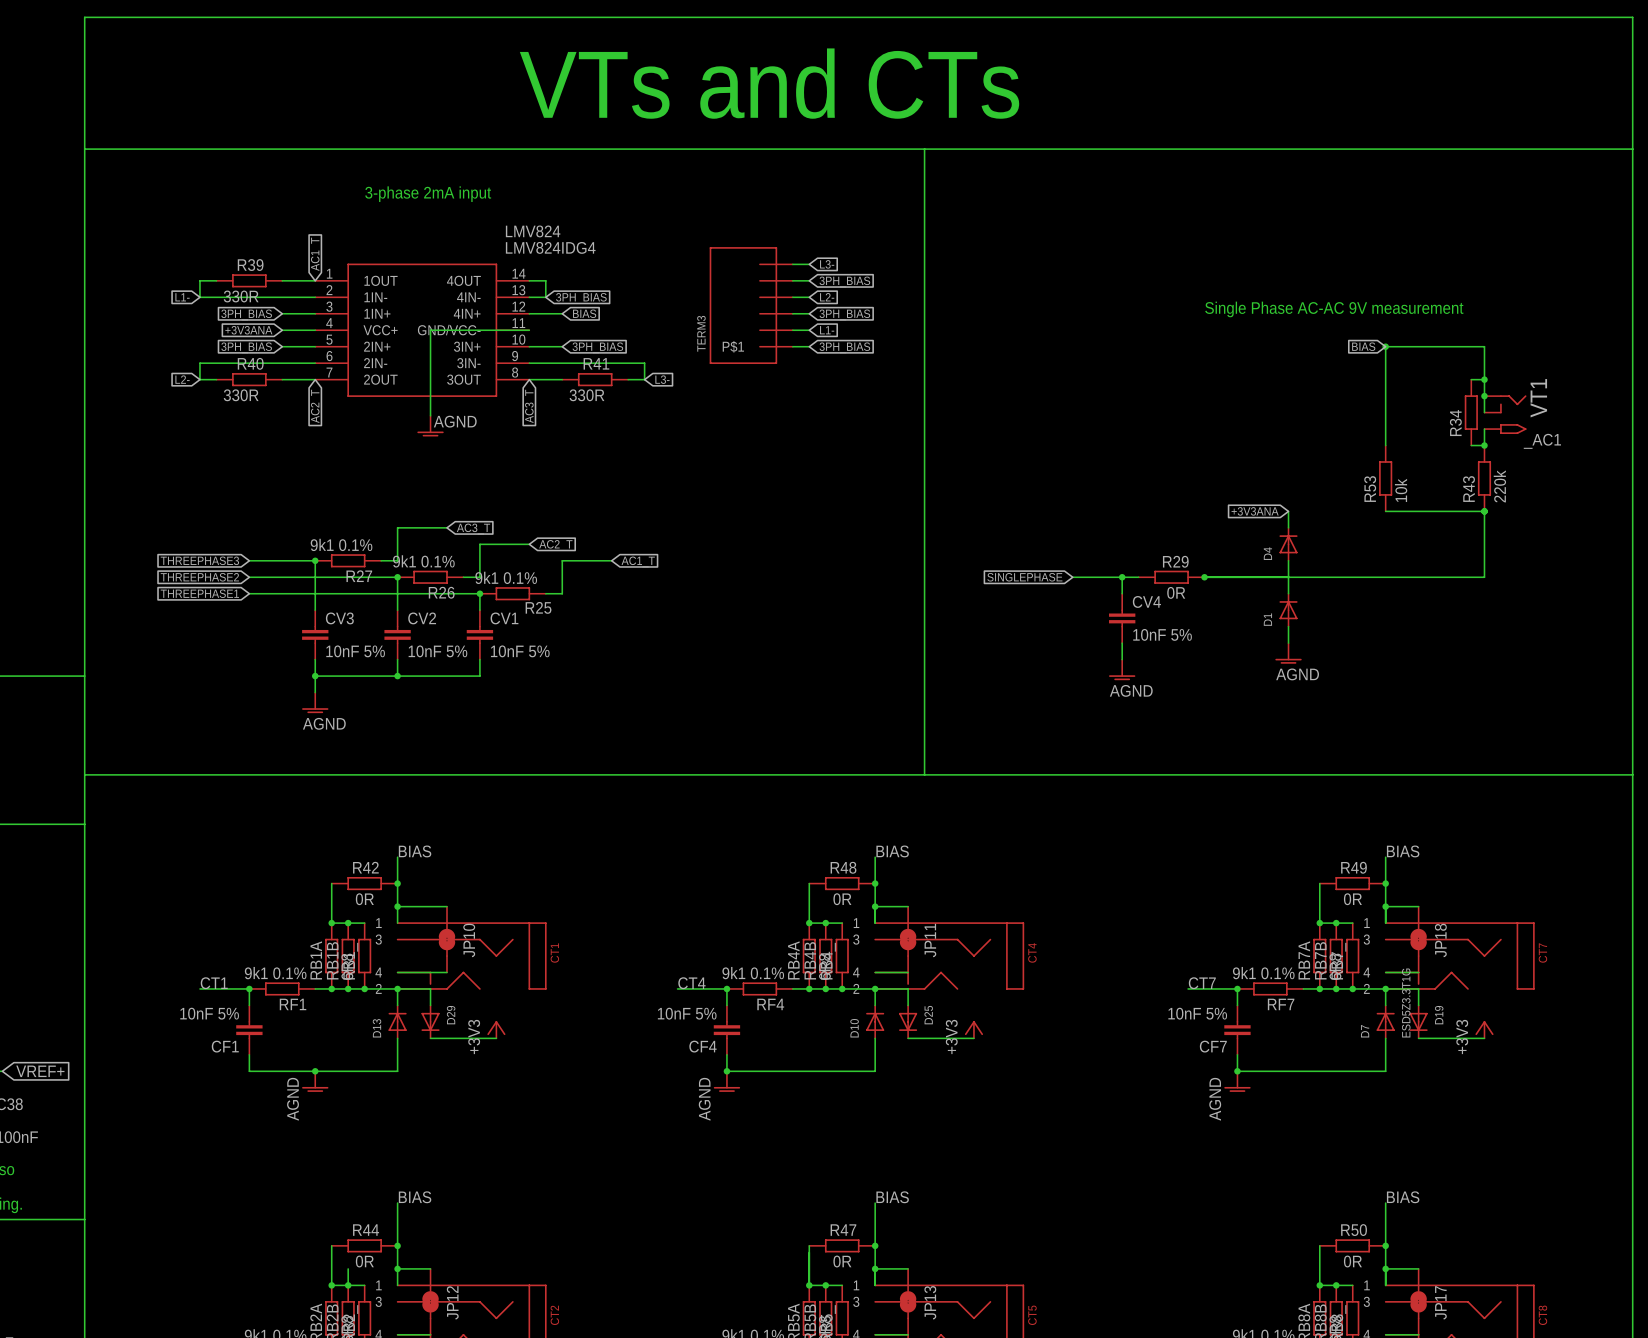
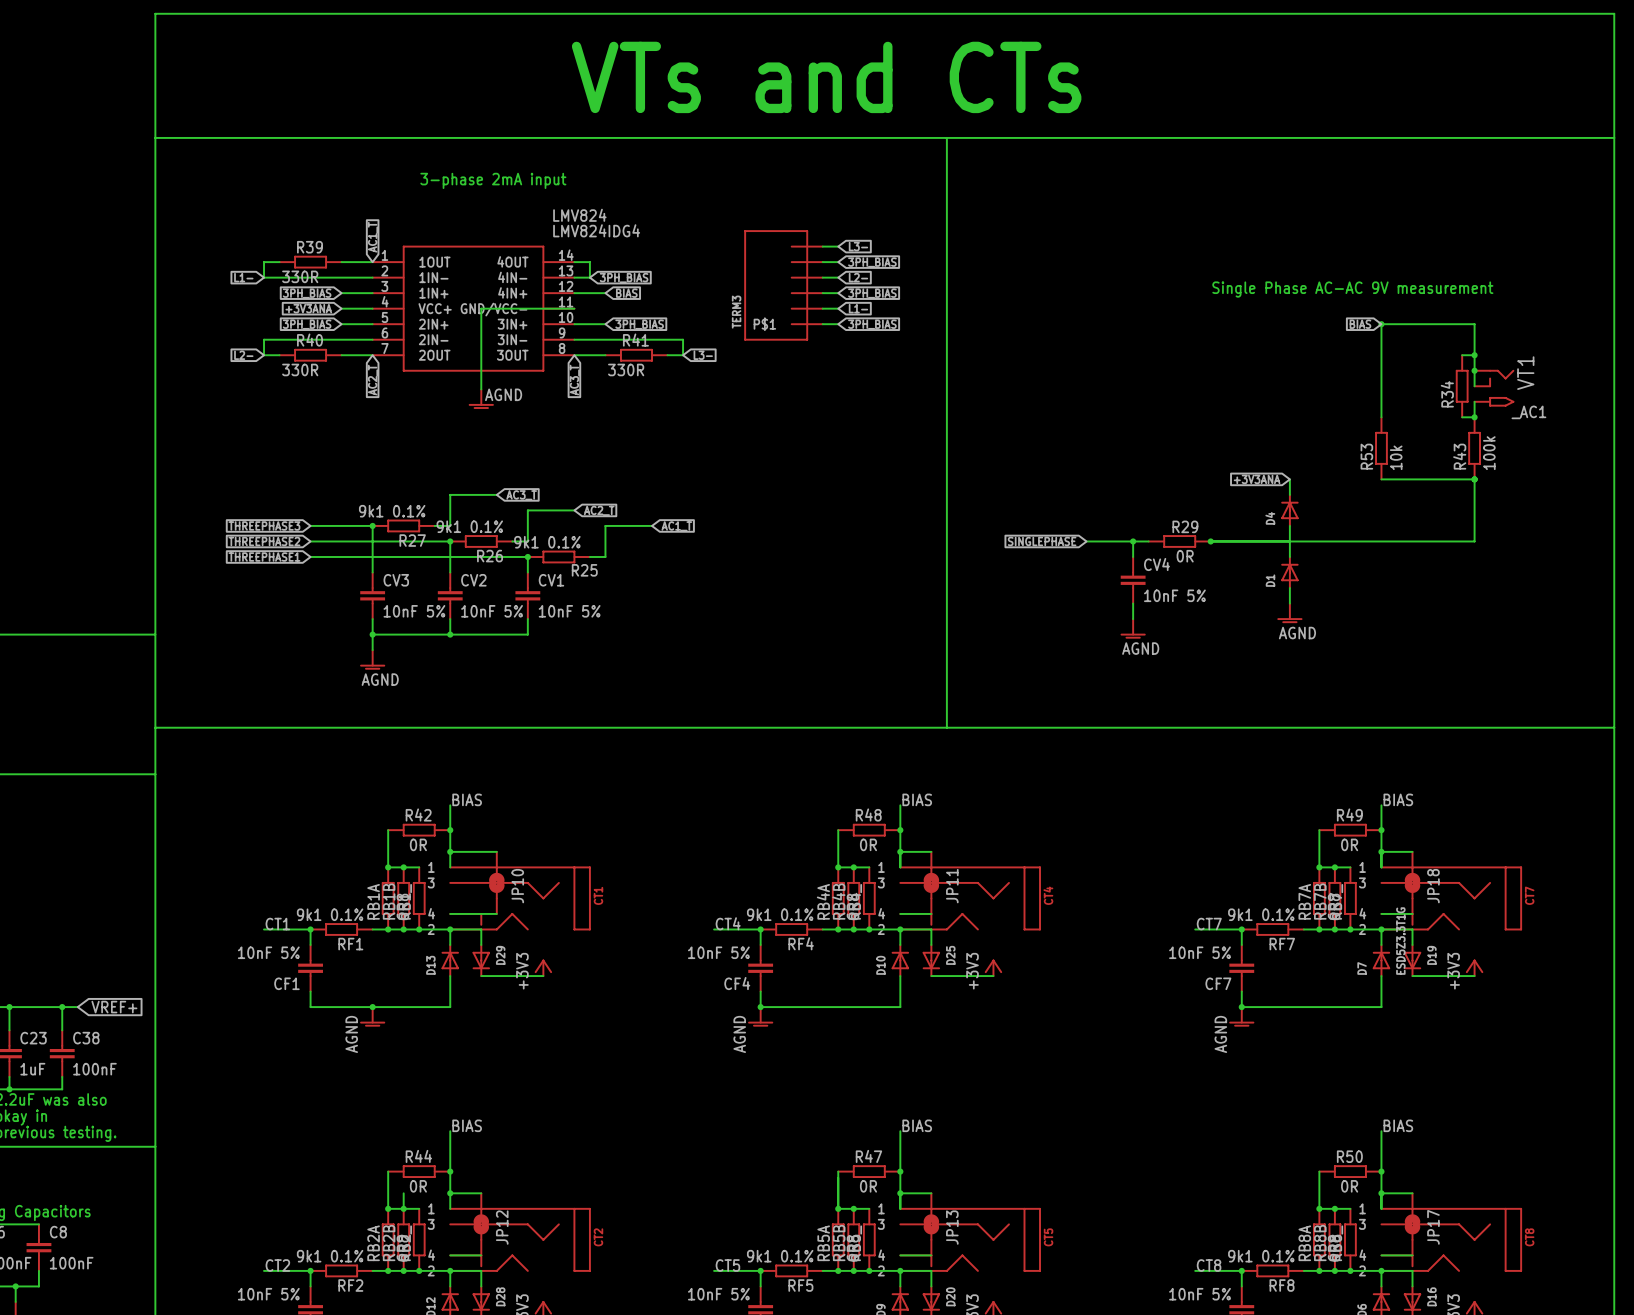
R43 value: 220k (1499, 486) -> 100k (1489, 453)

